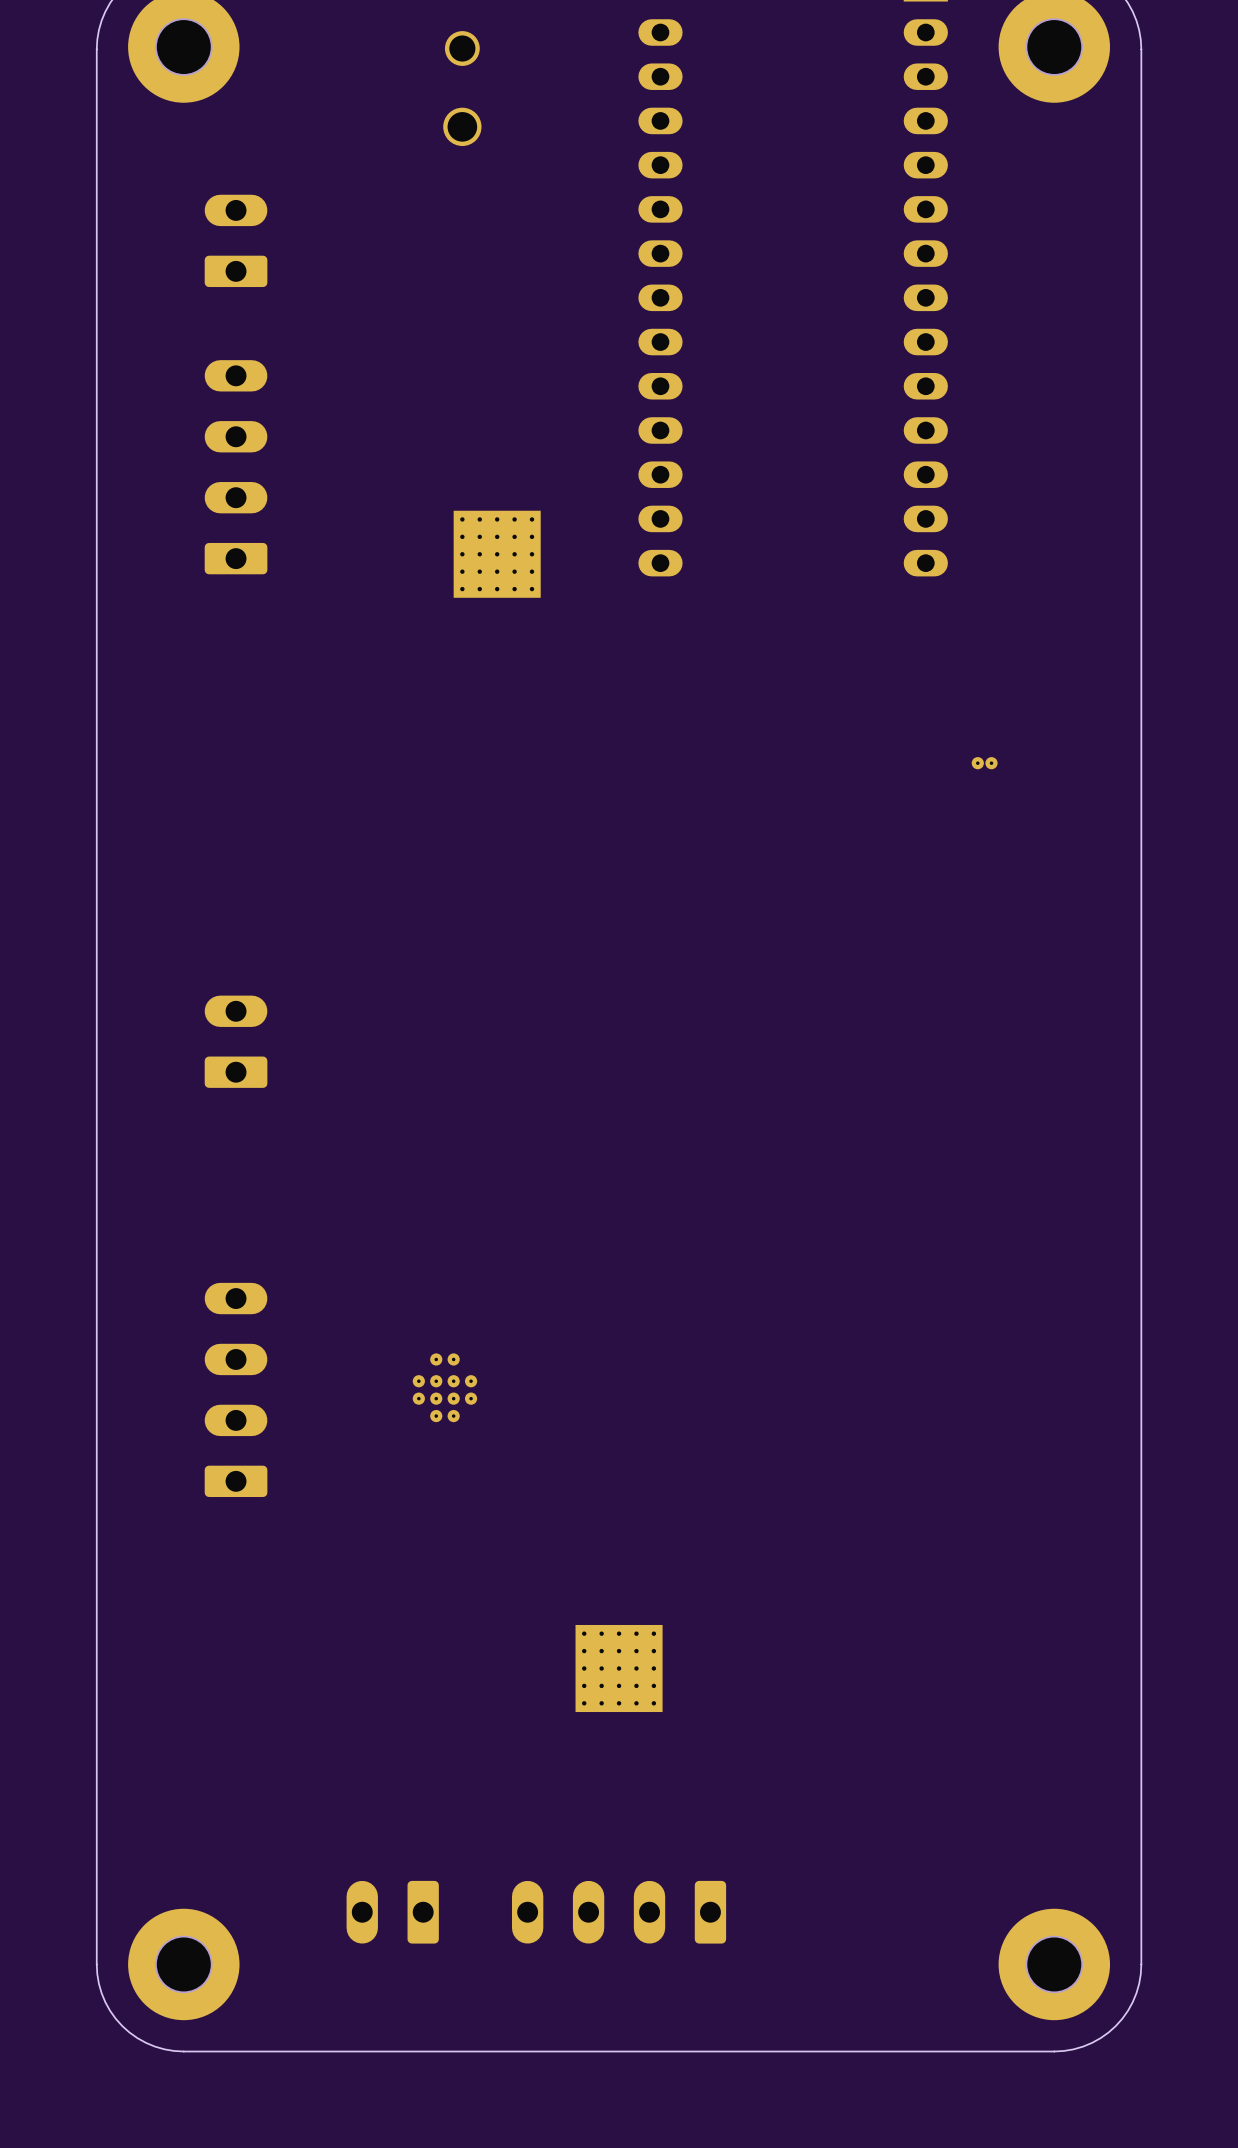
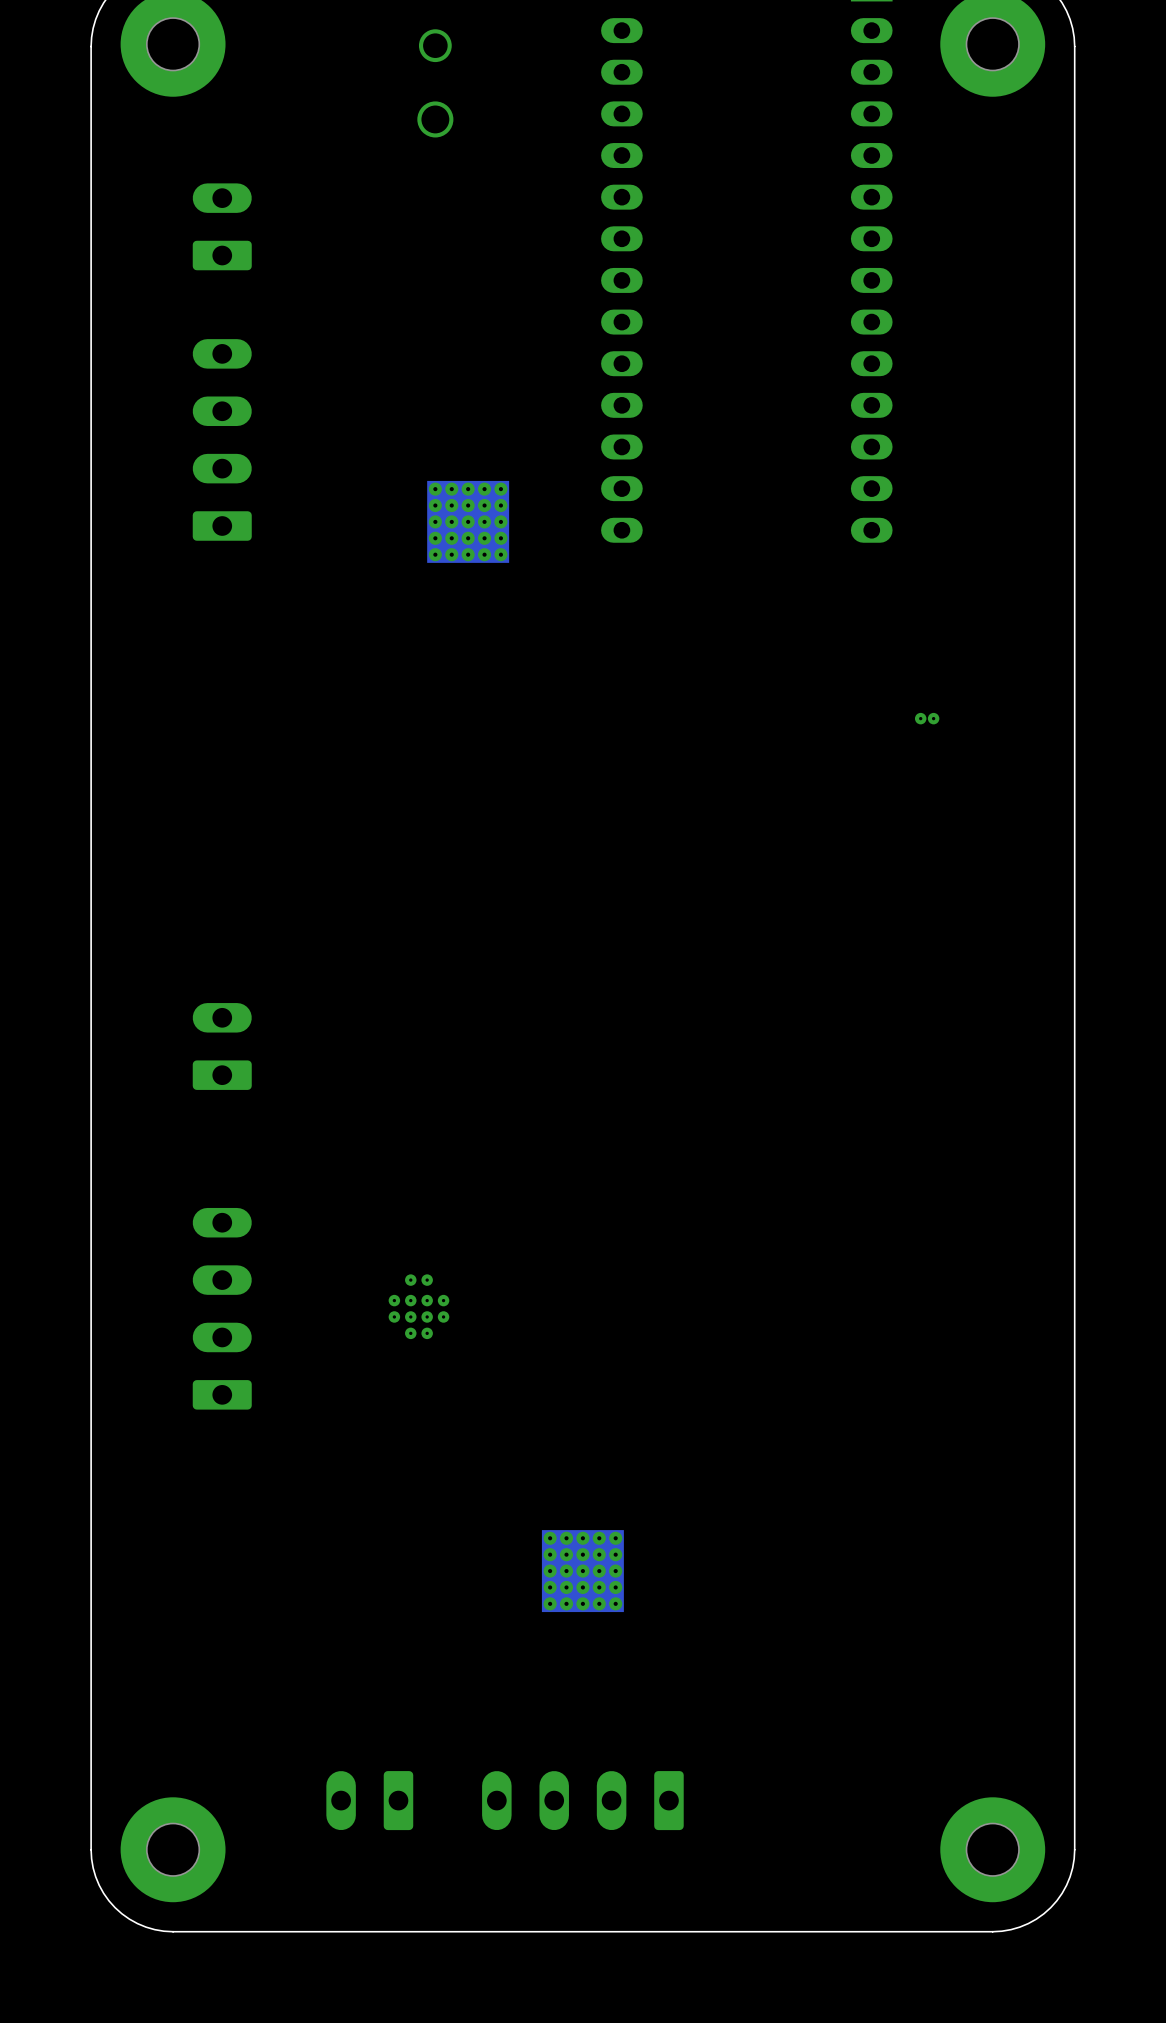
part position: (236, 1041) -> (222, 1046)

